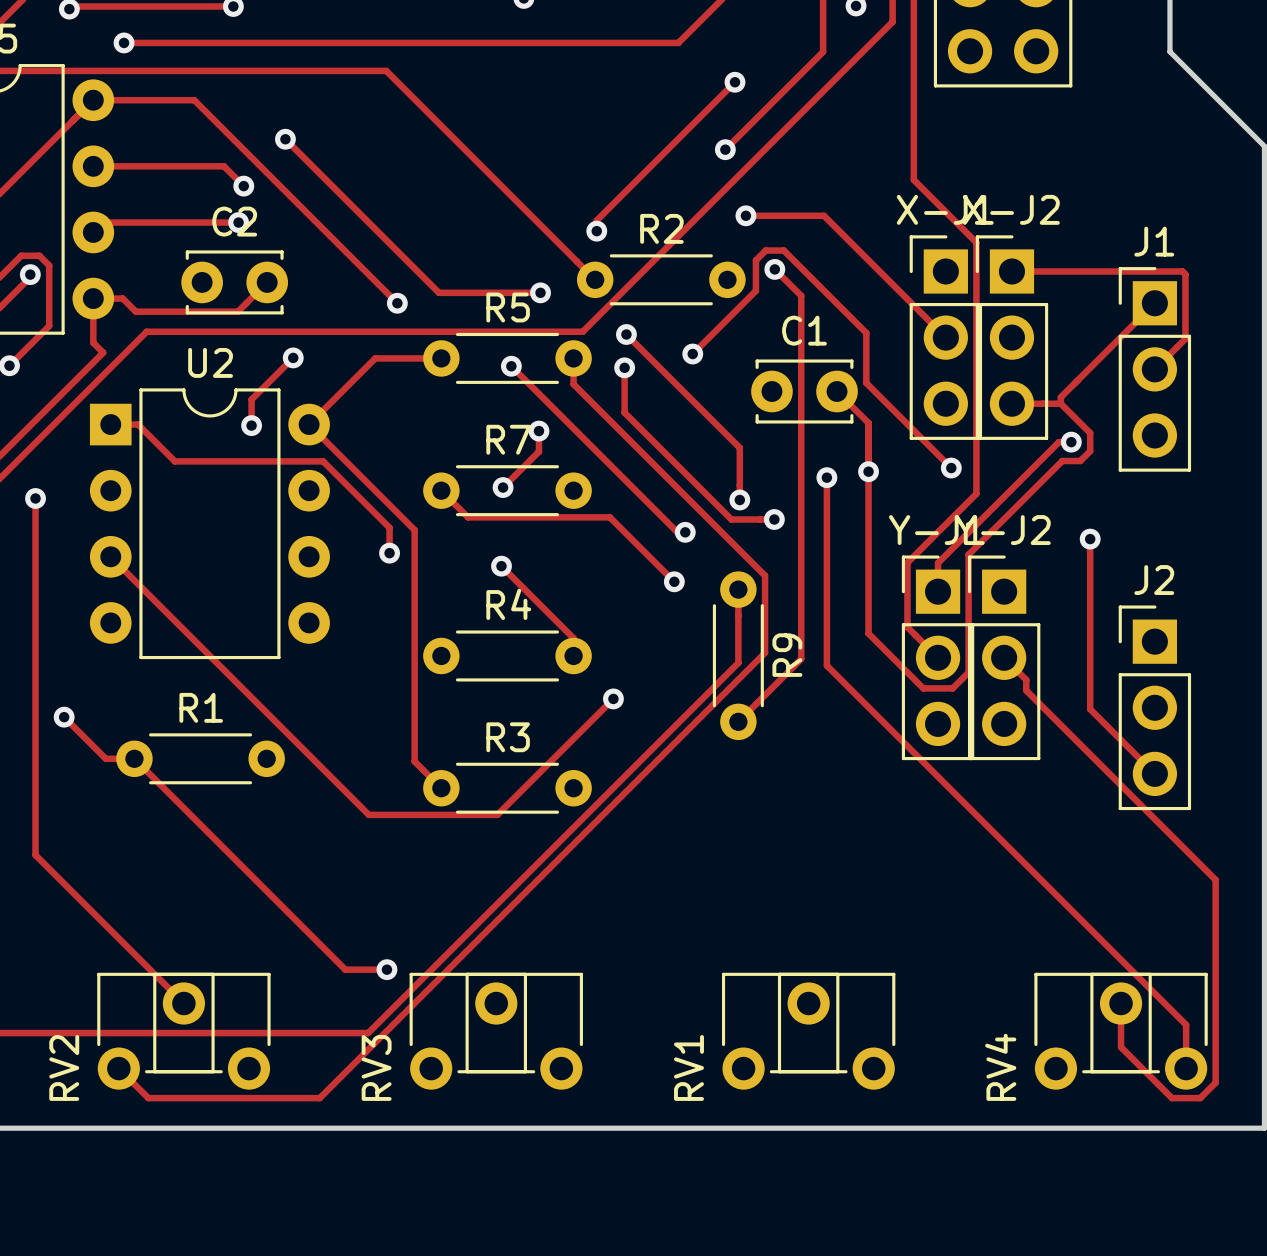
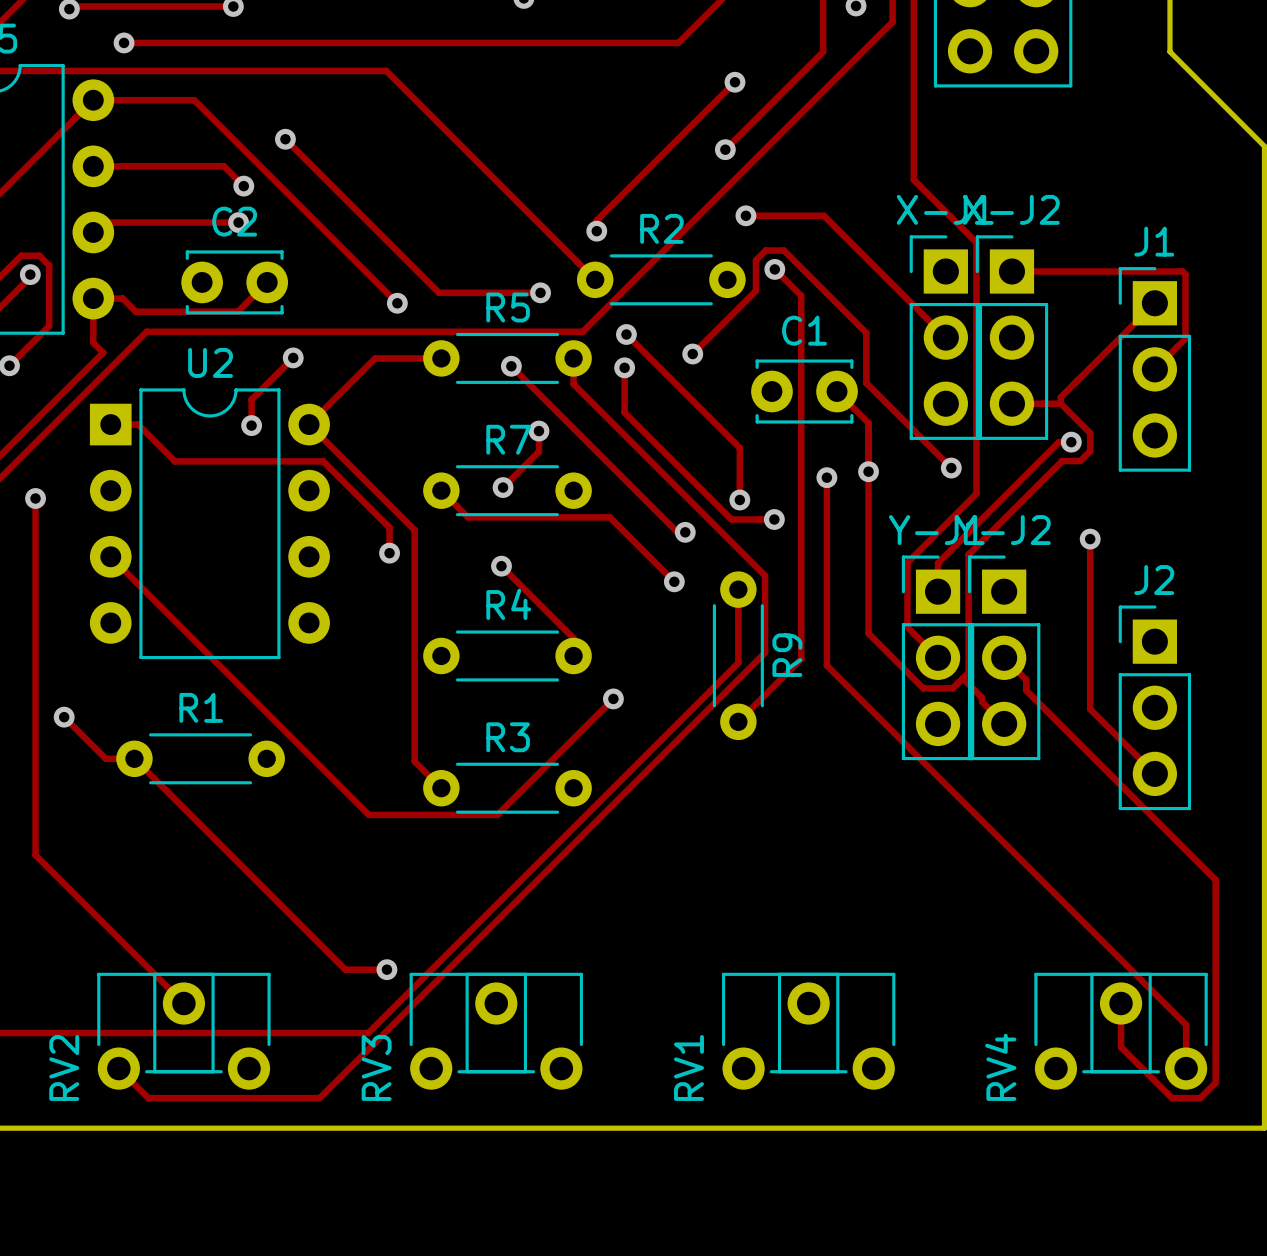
track: none -> (962, 678) (1004, 723)

